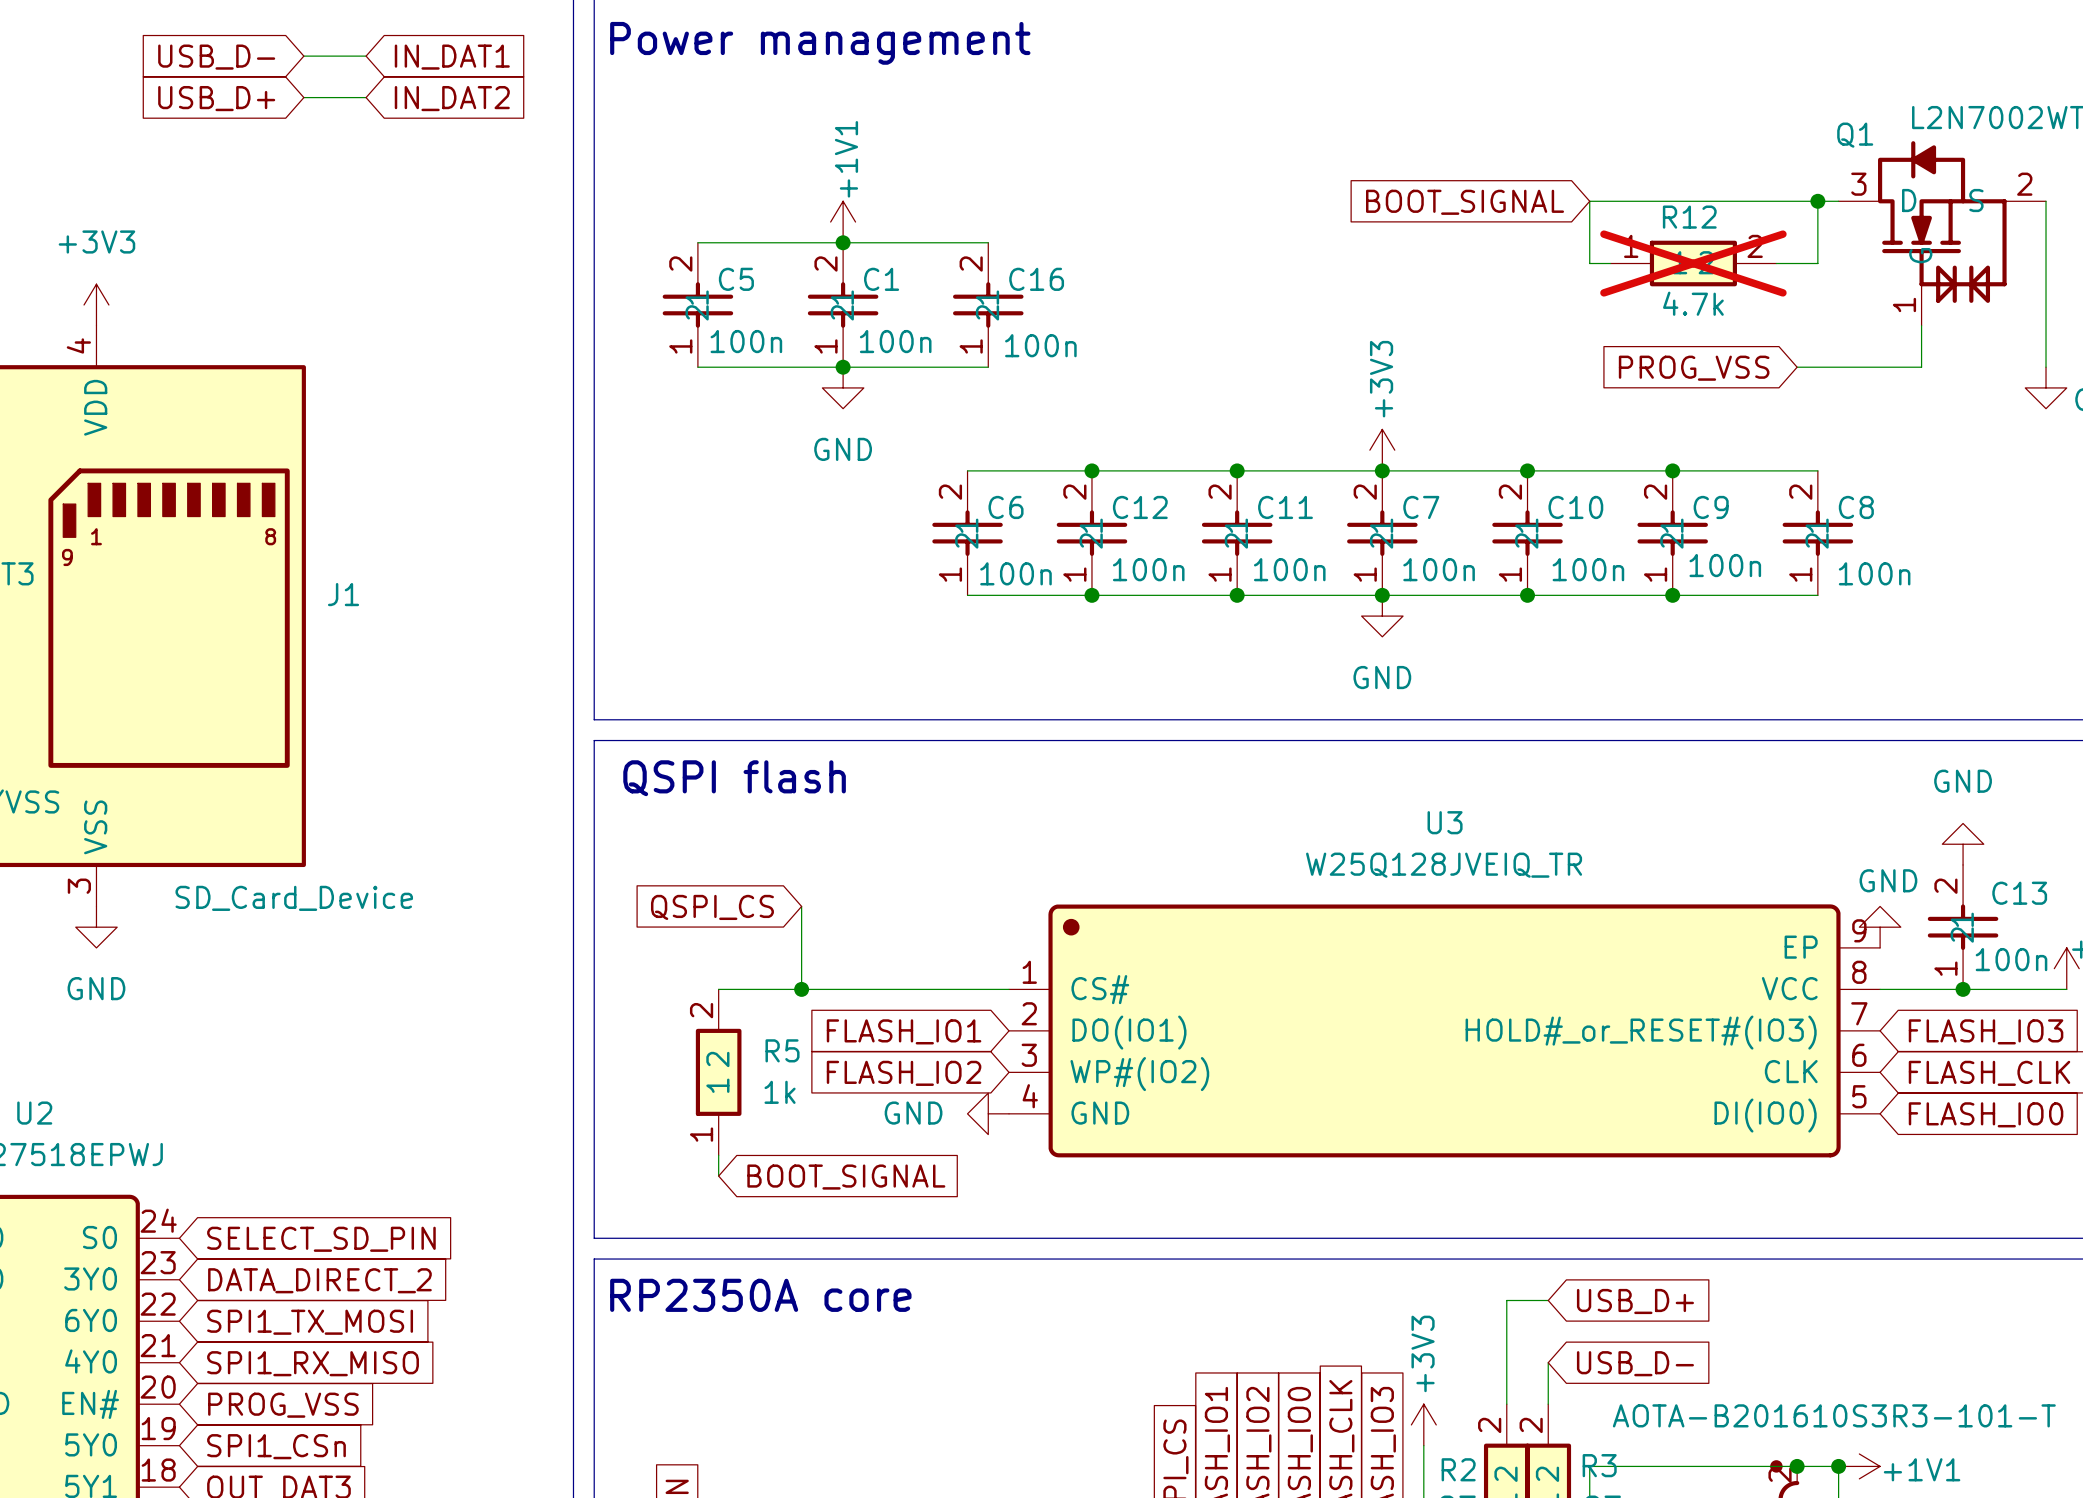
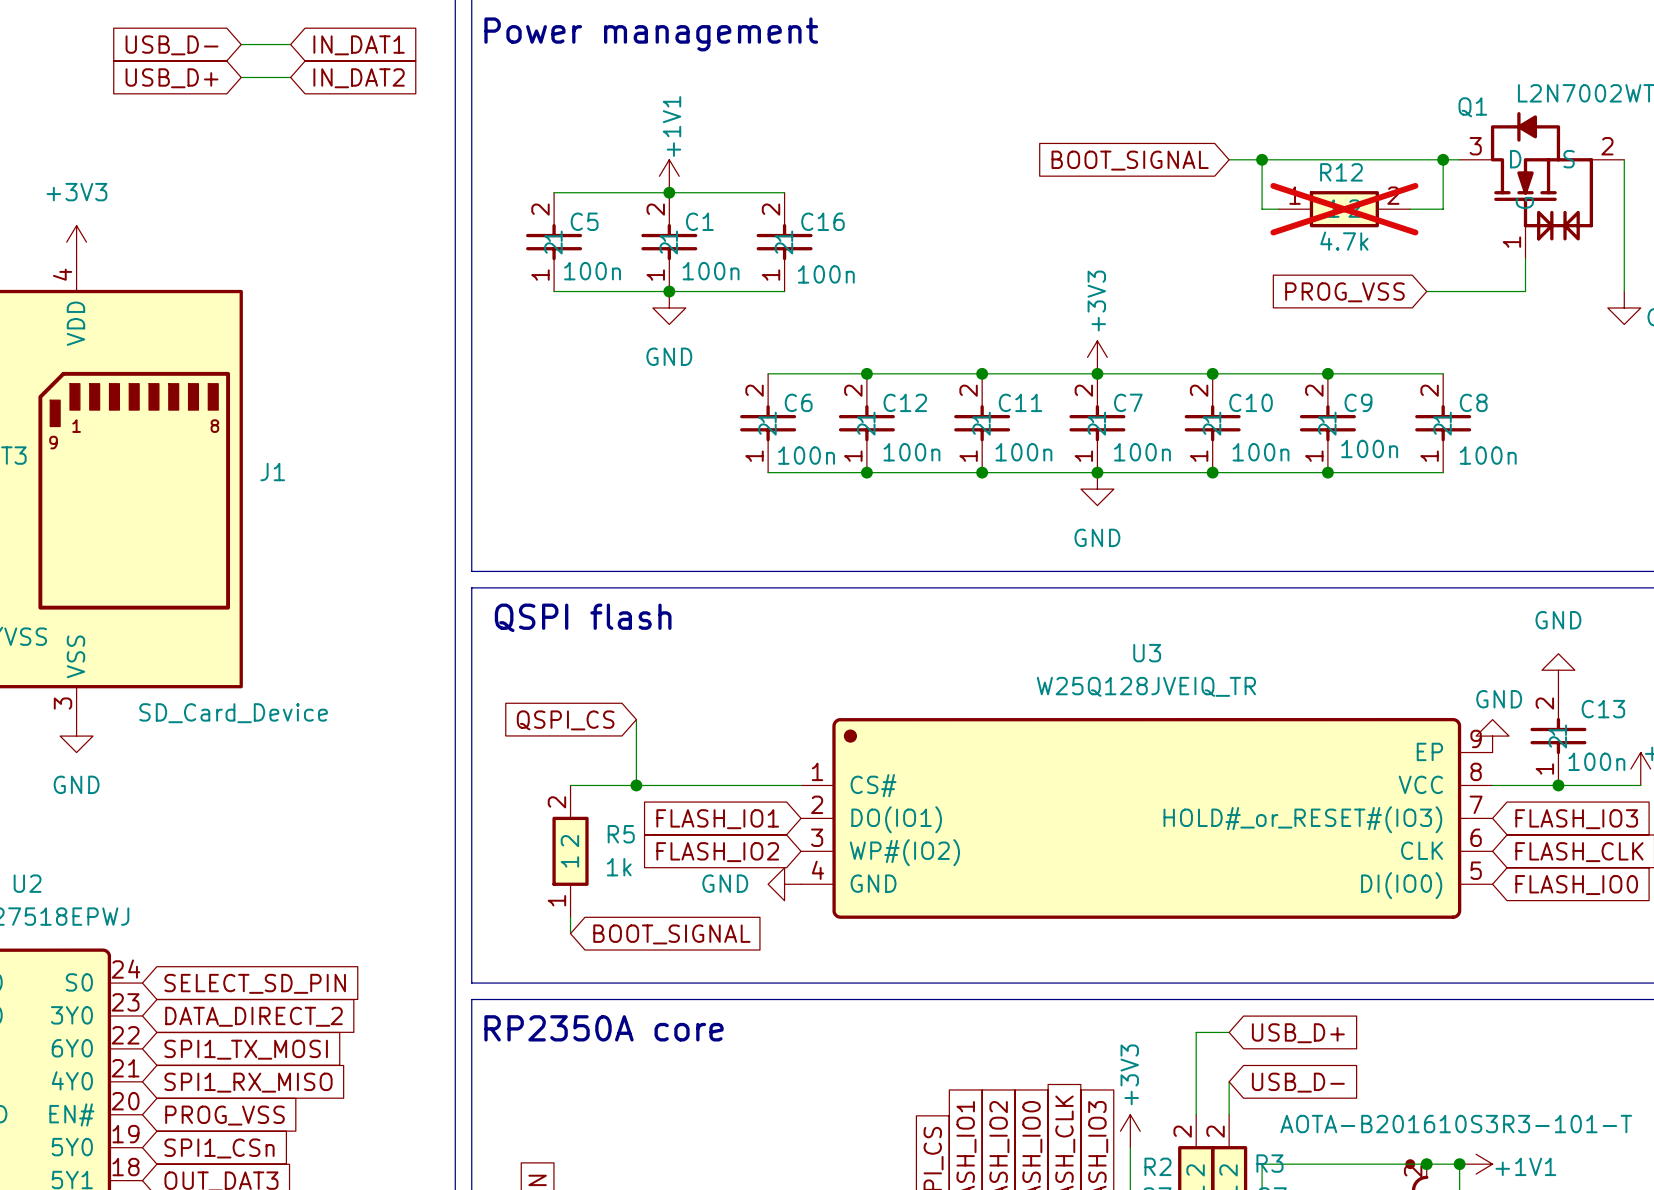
wire: none -> (1229, 159) (1262, 159)
junction: none -> (1262, 159)
global label position: BOOT_SIGNAL (1465, 202) -> BOOT_SIGNAL (1130, 160)

